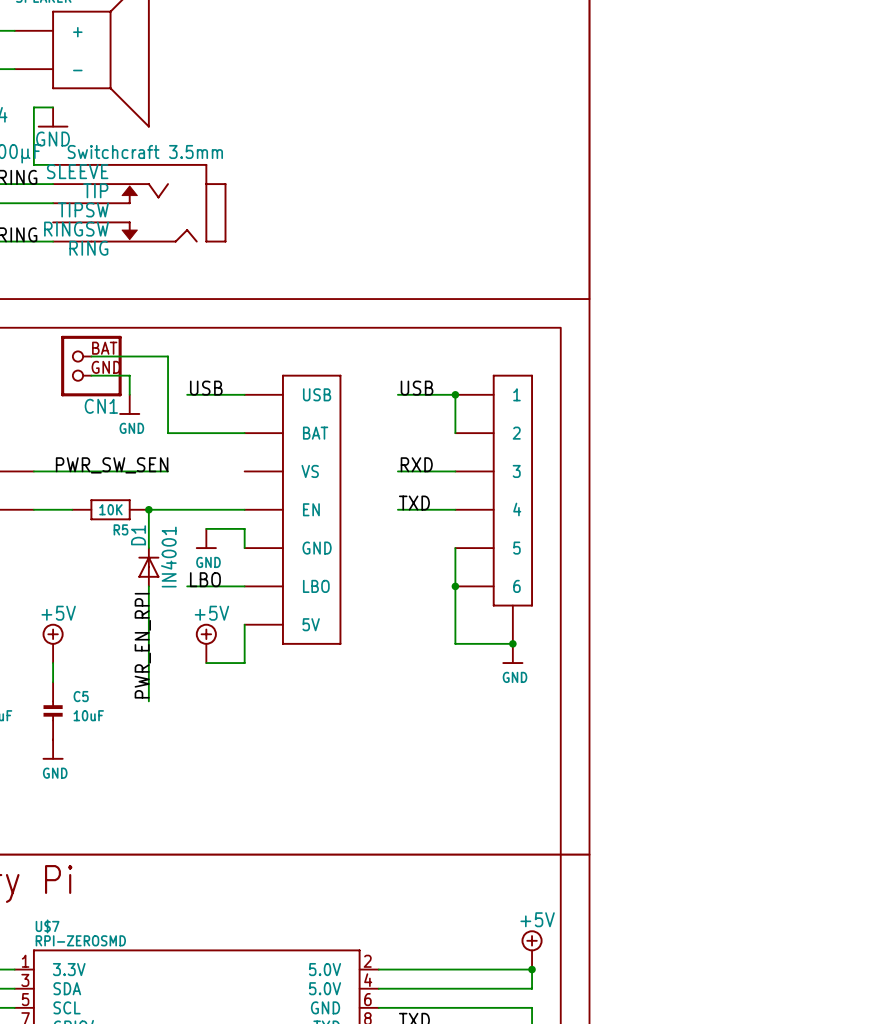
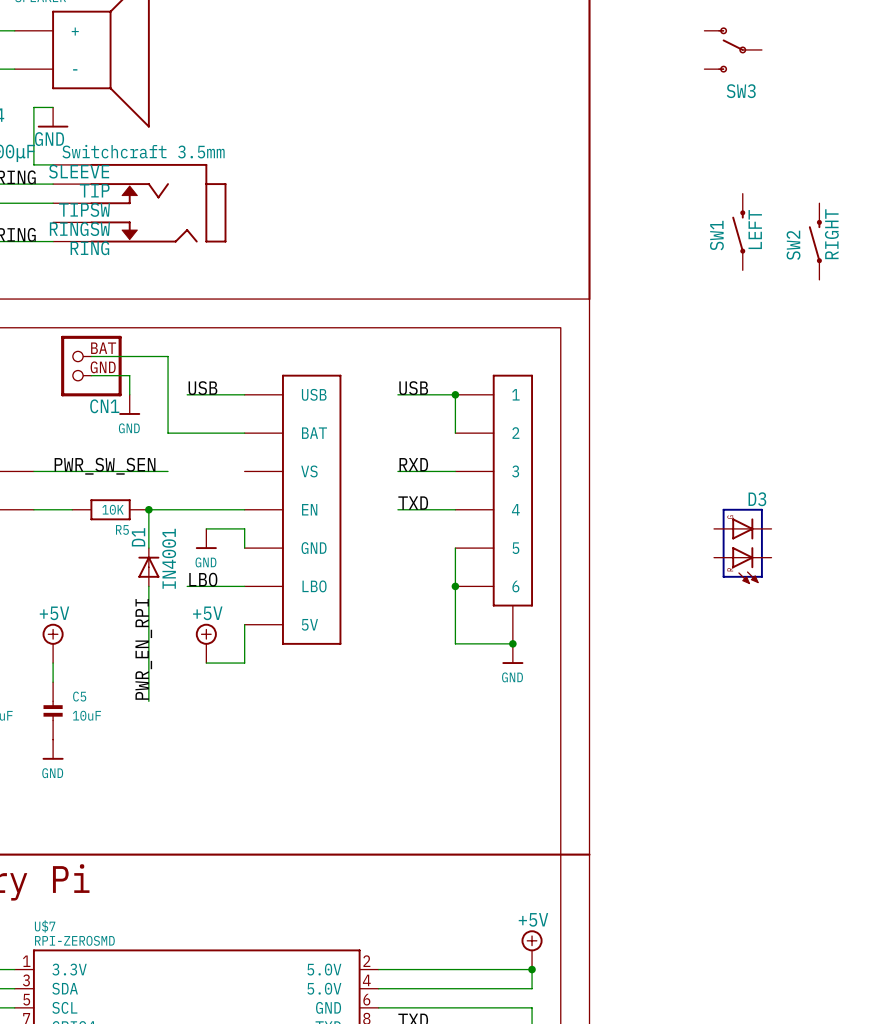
SW3: none -> (733, 49)
SW1: none -> LEFT (738, 231)
SW2: none -> RIGHT (815, 241)
D3: none -> (742, 546)

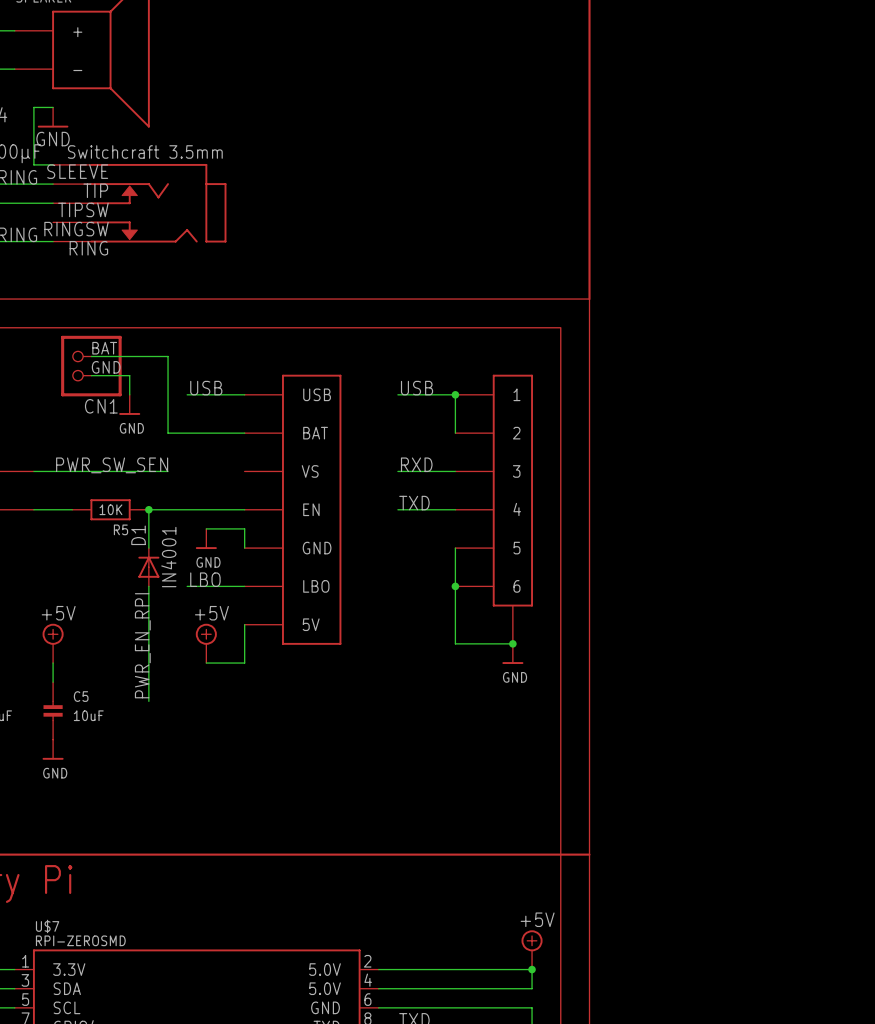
SW3: (733, 49) -> none
SW1: LEFT (738, 231) -> none
SW2: RIGHT (815, 241) -> none
D3: (742, 546) -> none

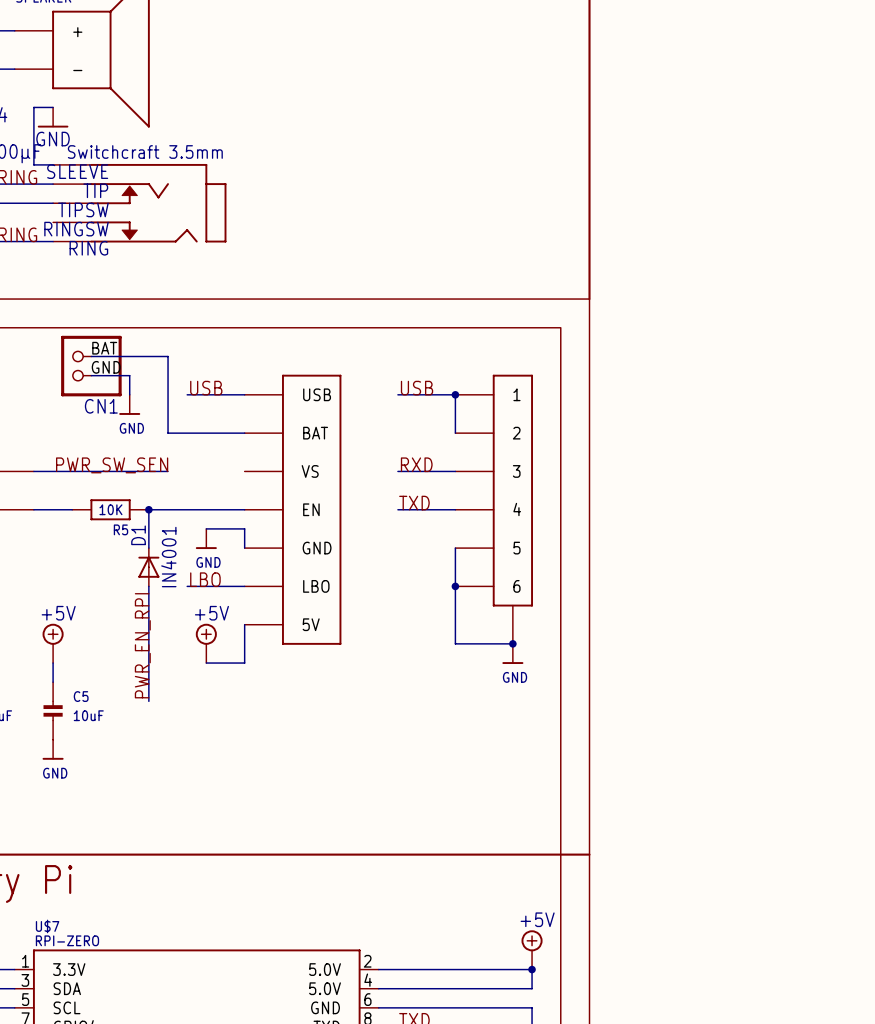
U$7 value: RPI-ZEROSMD (80, 940) -> RPI-ZERO (67, 940)

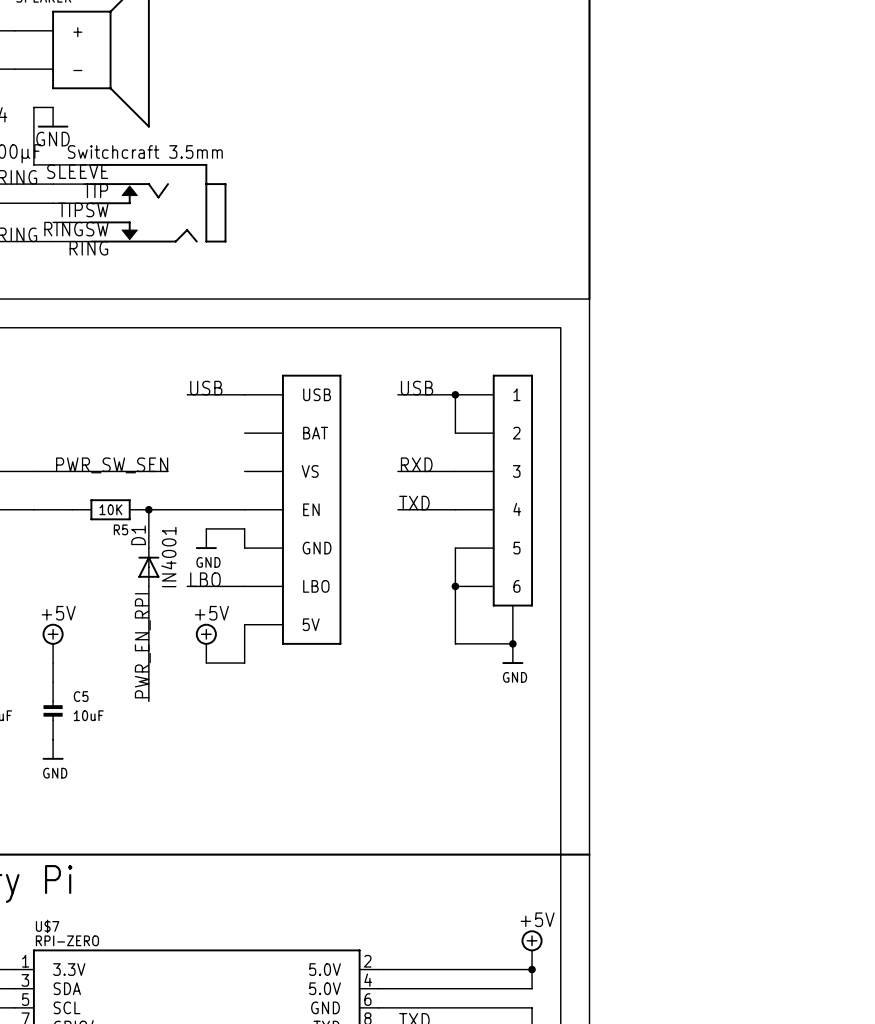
wire: (91, 356) (168, 356) (168, 433) (244, 433) -> none
CN1: (91, 366) -> none
wire: (91, 375) (129, 375) (129, 394) -> none
power symbol: GND (129, 404) -> none

